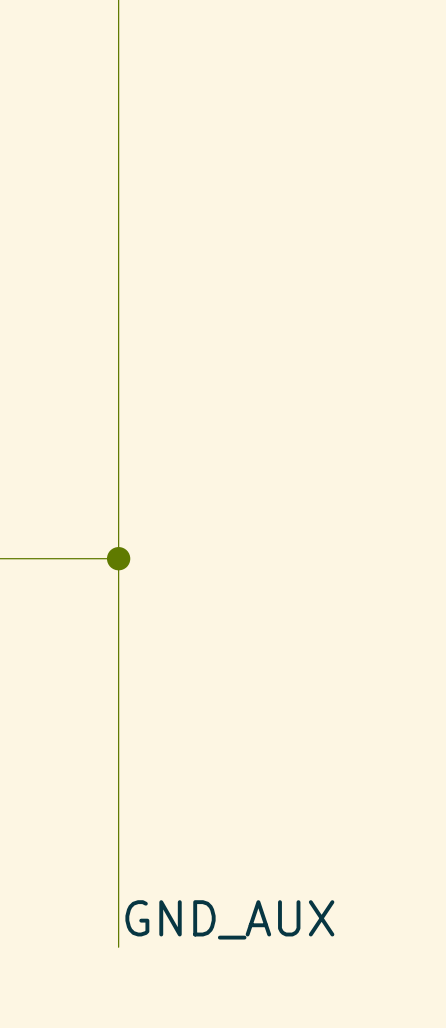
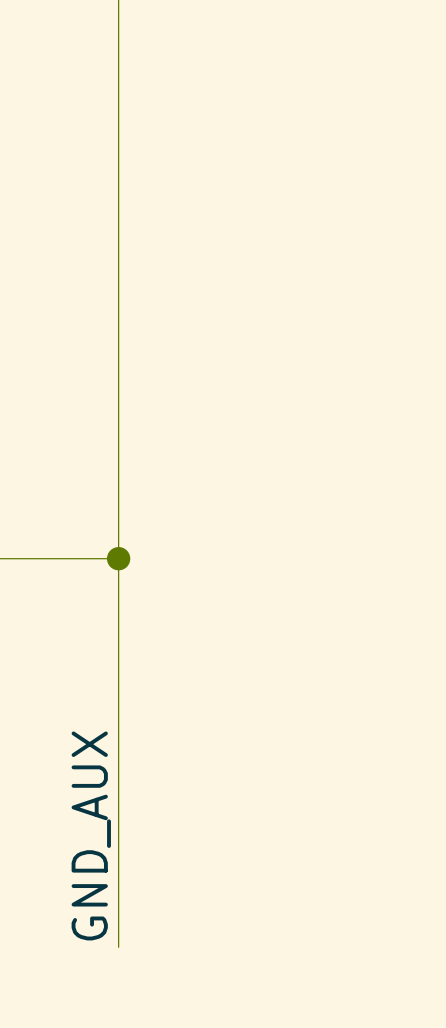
label rotation: 0° (229, 919) -> 90° counterclockwise (91, 835)

